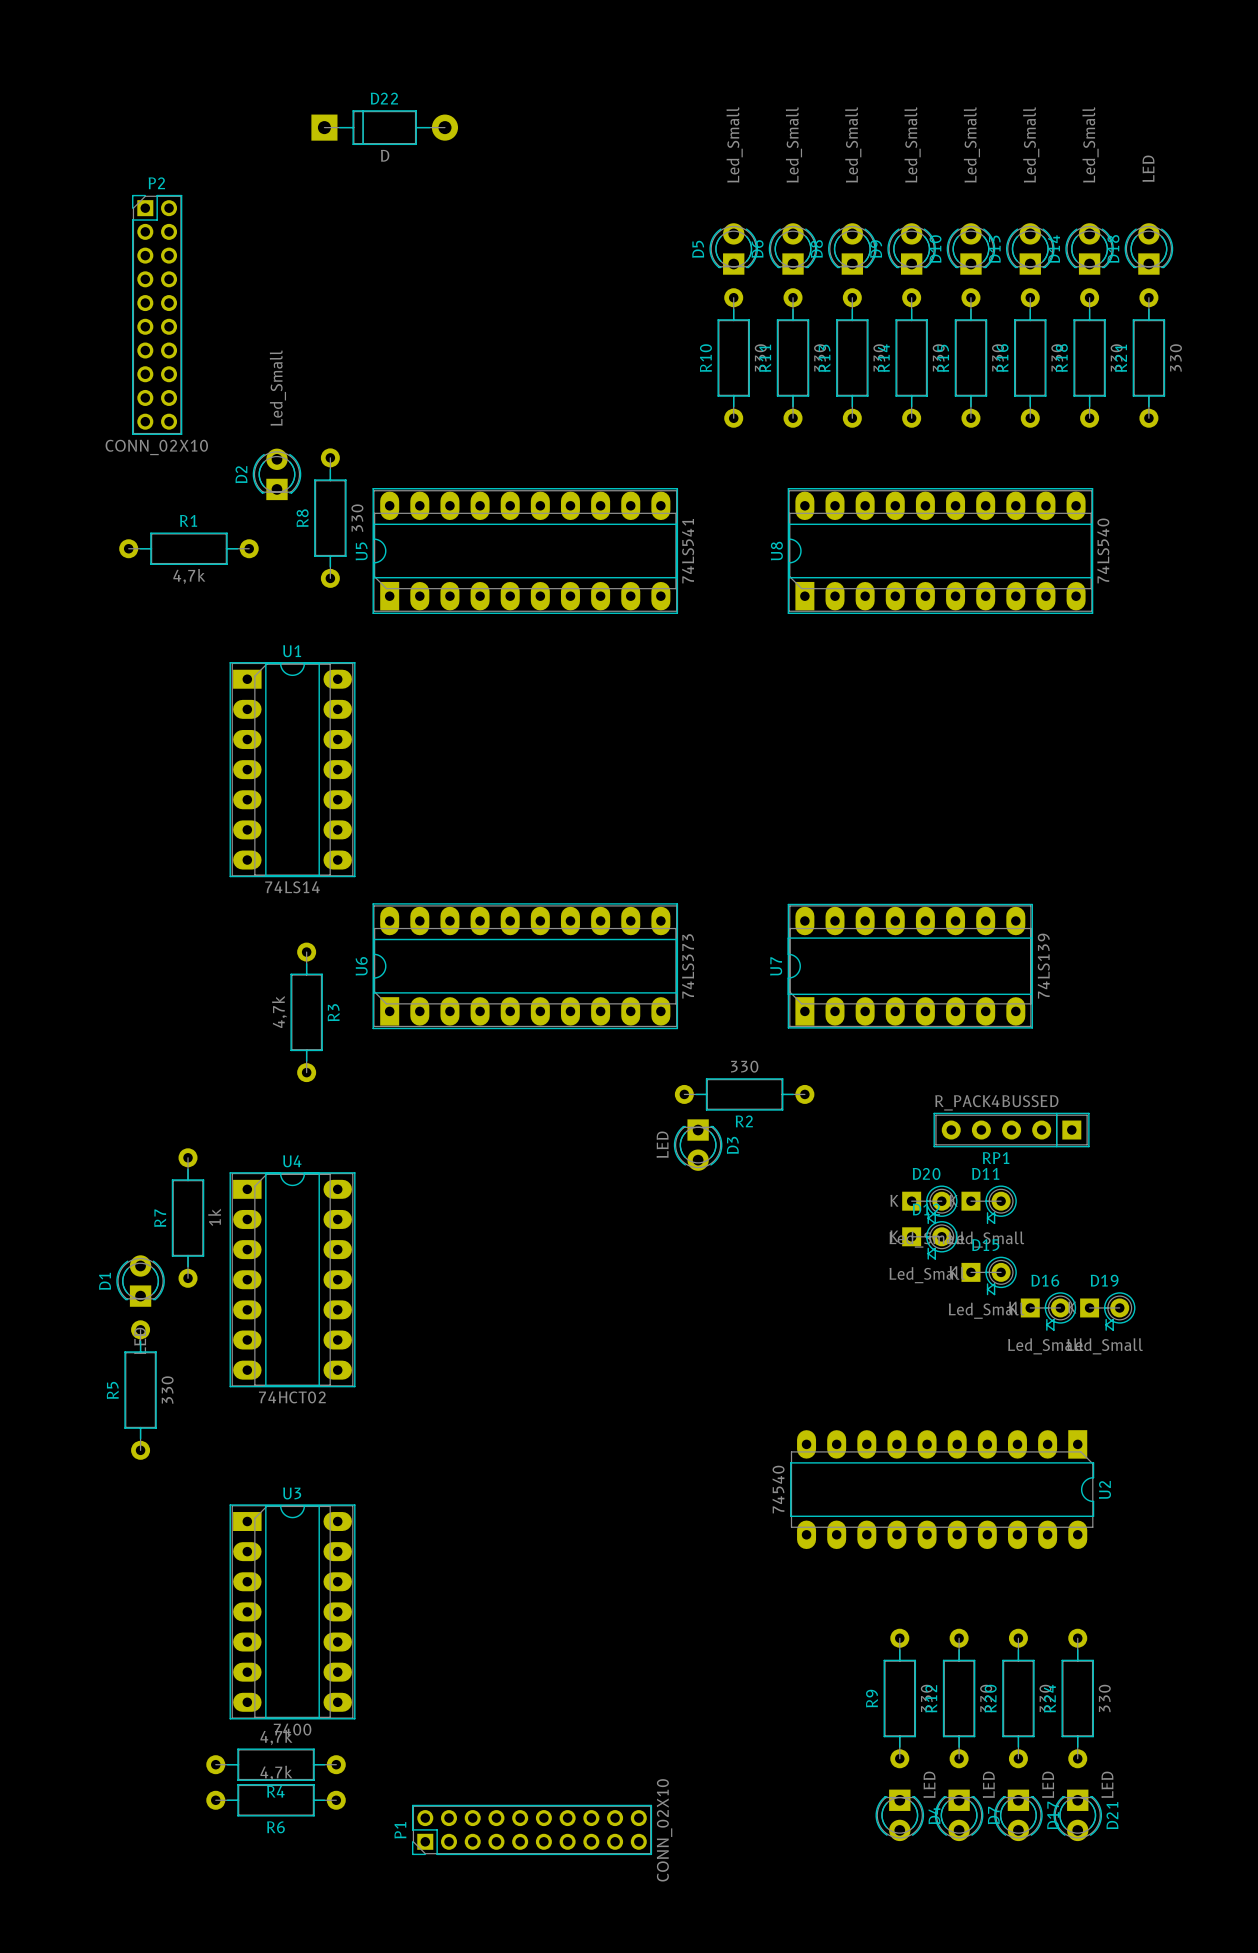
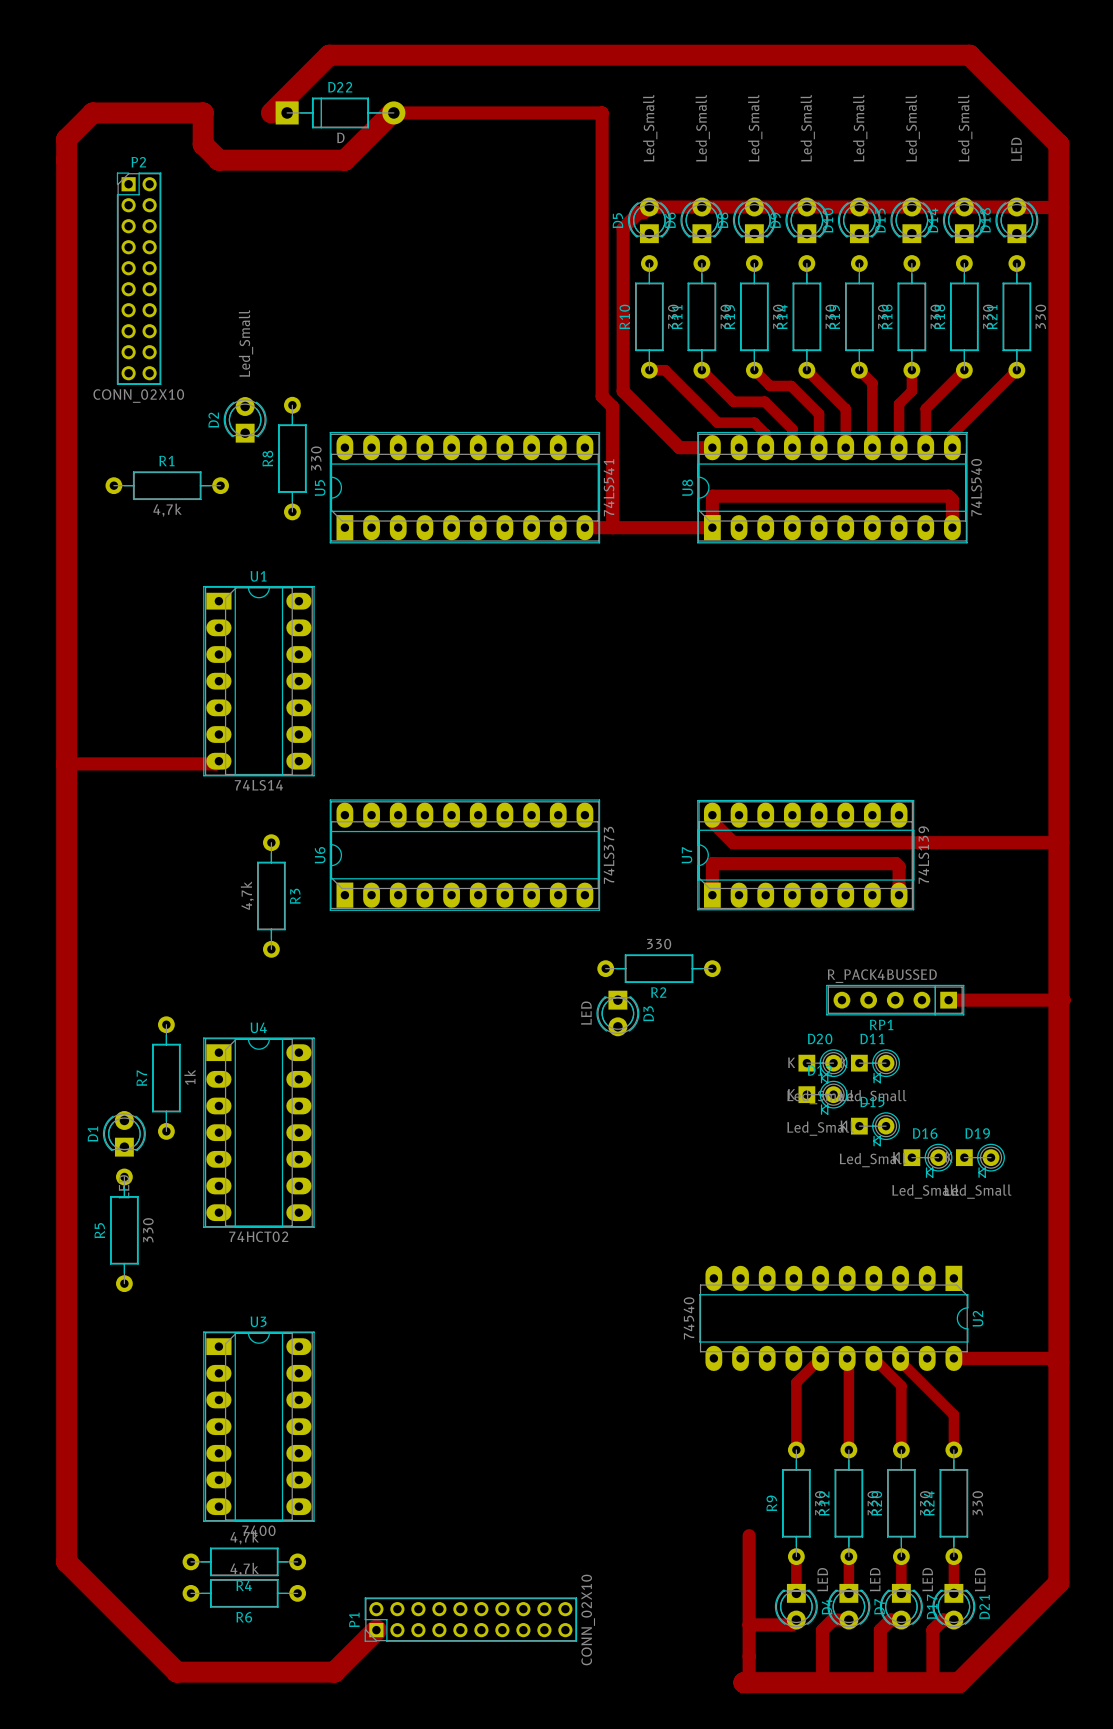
track: none -> (271, 112) (329, 55) (969, 55) (1058, 144) (1058, 1582) (959, 1682) (743, 1682)
track: none -> (1058, 207) (649, 207) (643, 212) (638, 212) (623, 228) (623, 391) (679, 447) (712, 447)
track: none -> (649, 370) (665, 370) (717, 422) (754, 422) (765, 434) (765, 447)
track: none -> (701, 370) (733, 401) (764, 401) (792, 429) (792, 447)
track: none -> (754, 370) (770, 385) (791, 385) (819, 413) (819, 447)
track: none -> (806, 370) (845, 409) (845, 447)
track: none -> (859, 370) (872, 383) (872, 447)
track: none -> (911, 370) (911, 391) (899, 403) (899, 447)
track: none -> (964, 370) (925, 408) (925, 447)
track: none -> (1016, 370) (952, 434) (952, 447)
track: none -> (584, 527) (712, 527) (712, 496) (948, 496) (952, 499) (952, 527)
track: none -> (612, 527) (612, 406) (602, 396) (602, 112) (392, 112) (344, 160) (218, 160) (203, 144) (203, 112) (92, 112) (66, 139) (66, 1561) (176, 1672) (334, 1672) (376, 1630)
track: none -> (218, 761) (216, 763) (66, 763)
track: none -> (712, 815) (712, 821) (733, 842) (1058, 842)
track: none -> (712, 895) (712, 863) (896, 863) (899, 866) (899, 895)
track: none -> (948, 1000) (1064, 1000)
track: none -> (820, 1358) (796, 1382) (796, 1449)
track: none -> (847, 1358) (848, 1360) (848, 1449)
track: none -> (873, 1358) (901, 1385) (901, 1449)
track: none -> (900, 1358) (900, 1361) (953, 1414) (953, 1449)
track: none -> (953, 1358) (1058, 1358) (1054, 1362)
track: none -> (749, 1535) (749, 1682)
track: none -> (796, 1556) (796, 1593)
track: none -> (848, 1556) (848, 1593)
track: none -> (901, 1556) (901, 1593)
track: none -> (953, 1556) (953, 1593)
track: none -> (796, 1620) (791, 1624) (749, 1624)
track: none -> (848, 1620) (832, 1620) (822, 1630) (822, 1682)
track: none -> (901, 1620) (890, 1620) (880, 1630) (880, 1682)
track: none -> (953, 1620) (942, 1620) (932, 1630) (932, 1682)

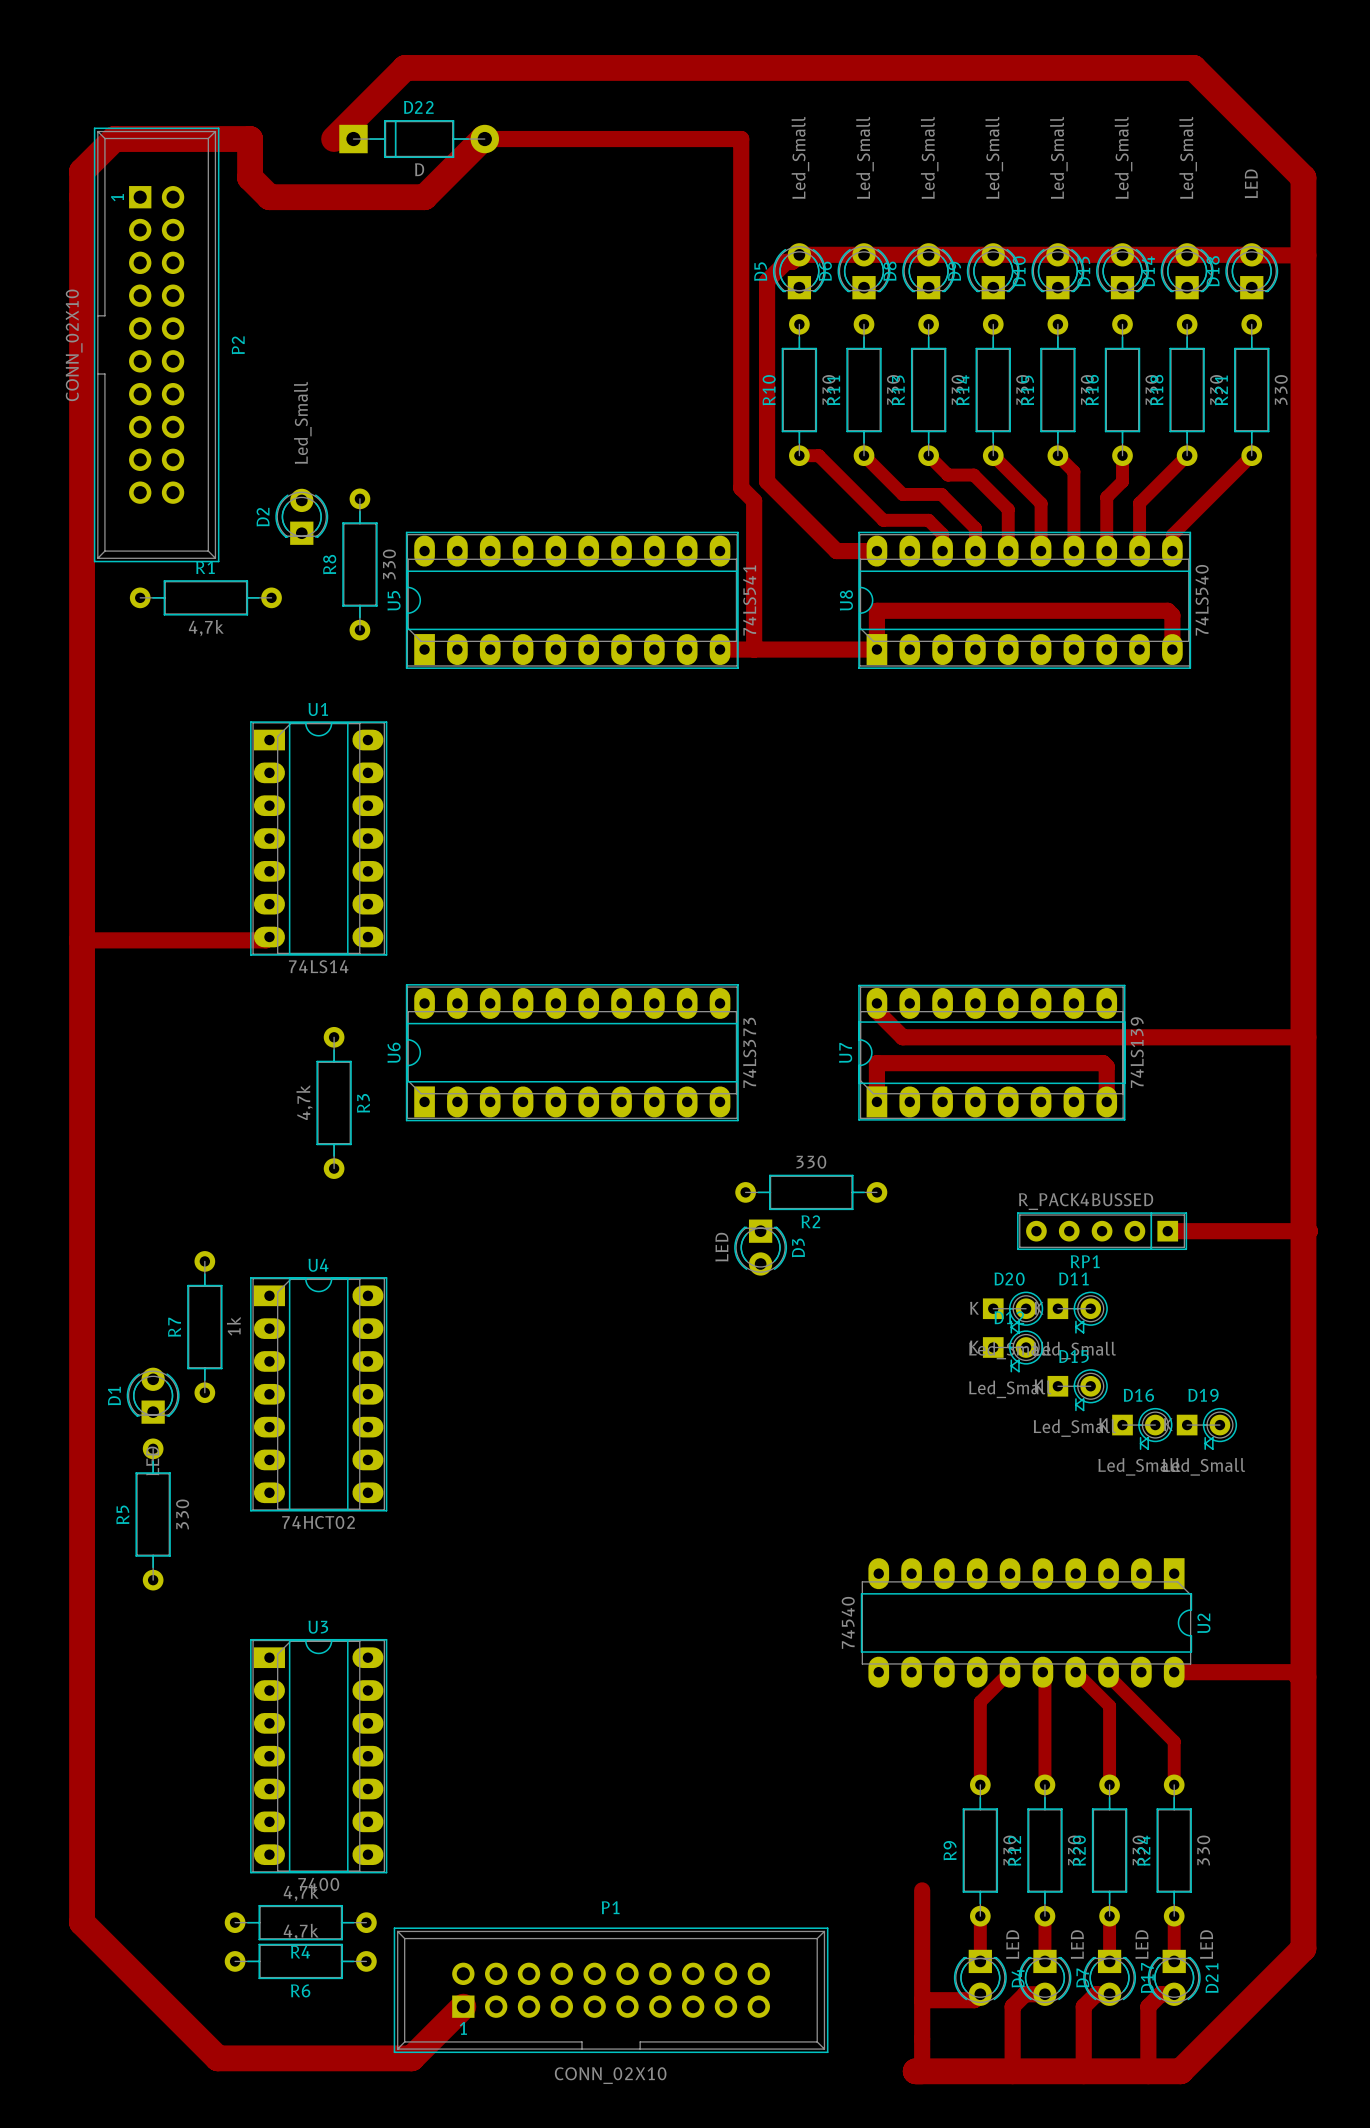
P2 name position: P2 (138, 162) -> P2 (238, 345)
P2 footprint: [116, 172, 162, 385] -> [93, 127, 220, 563]
P2 value position: CONN_02X10 (138, 396) -> CONN_02X10 (74, 345)
P1 footprint: [364, 1597, 578, 1642] -> [393, 1927, 829, 2054]
P1 name position: P1 (354, 1619) -> P1 (610, 1907)
P1 value position: CONN_02X10 (588, 1619) -> CONN_02X10 (610, 2075)

